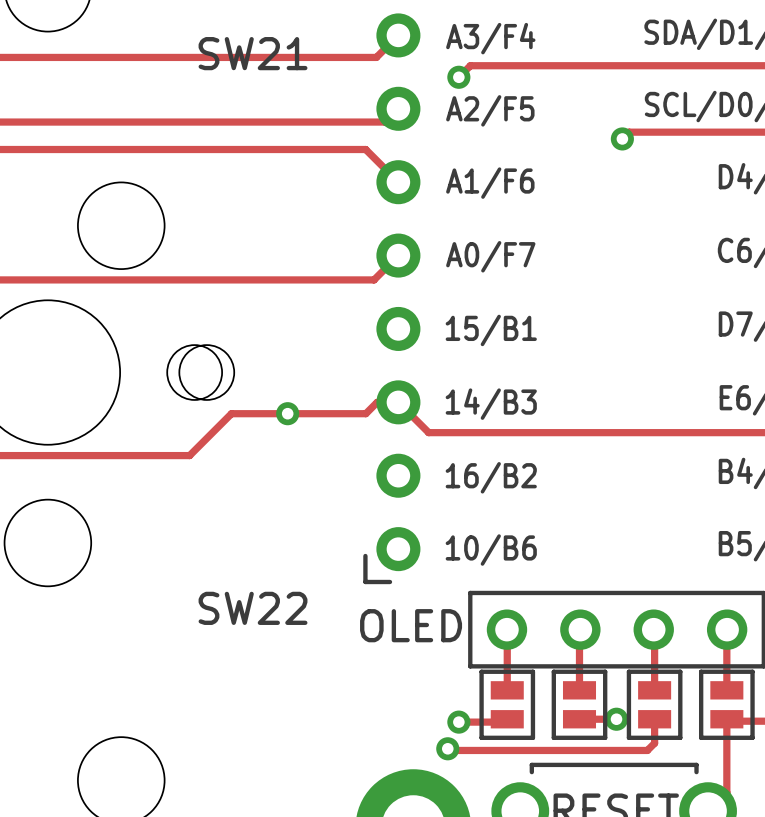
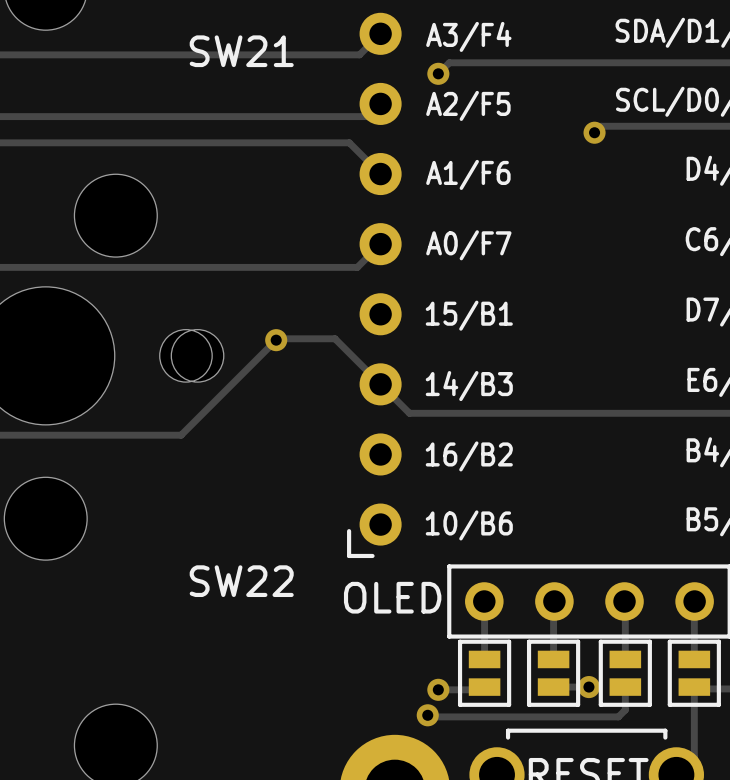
track: (398, 402) (377, 402) (365, 413) (231, 413) -> (380, 384) (335, 338) (277, 338) (221, 395)
via position: (287, 413) -> (276, 340)

